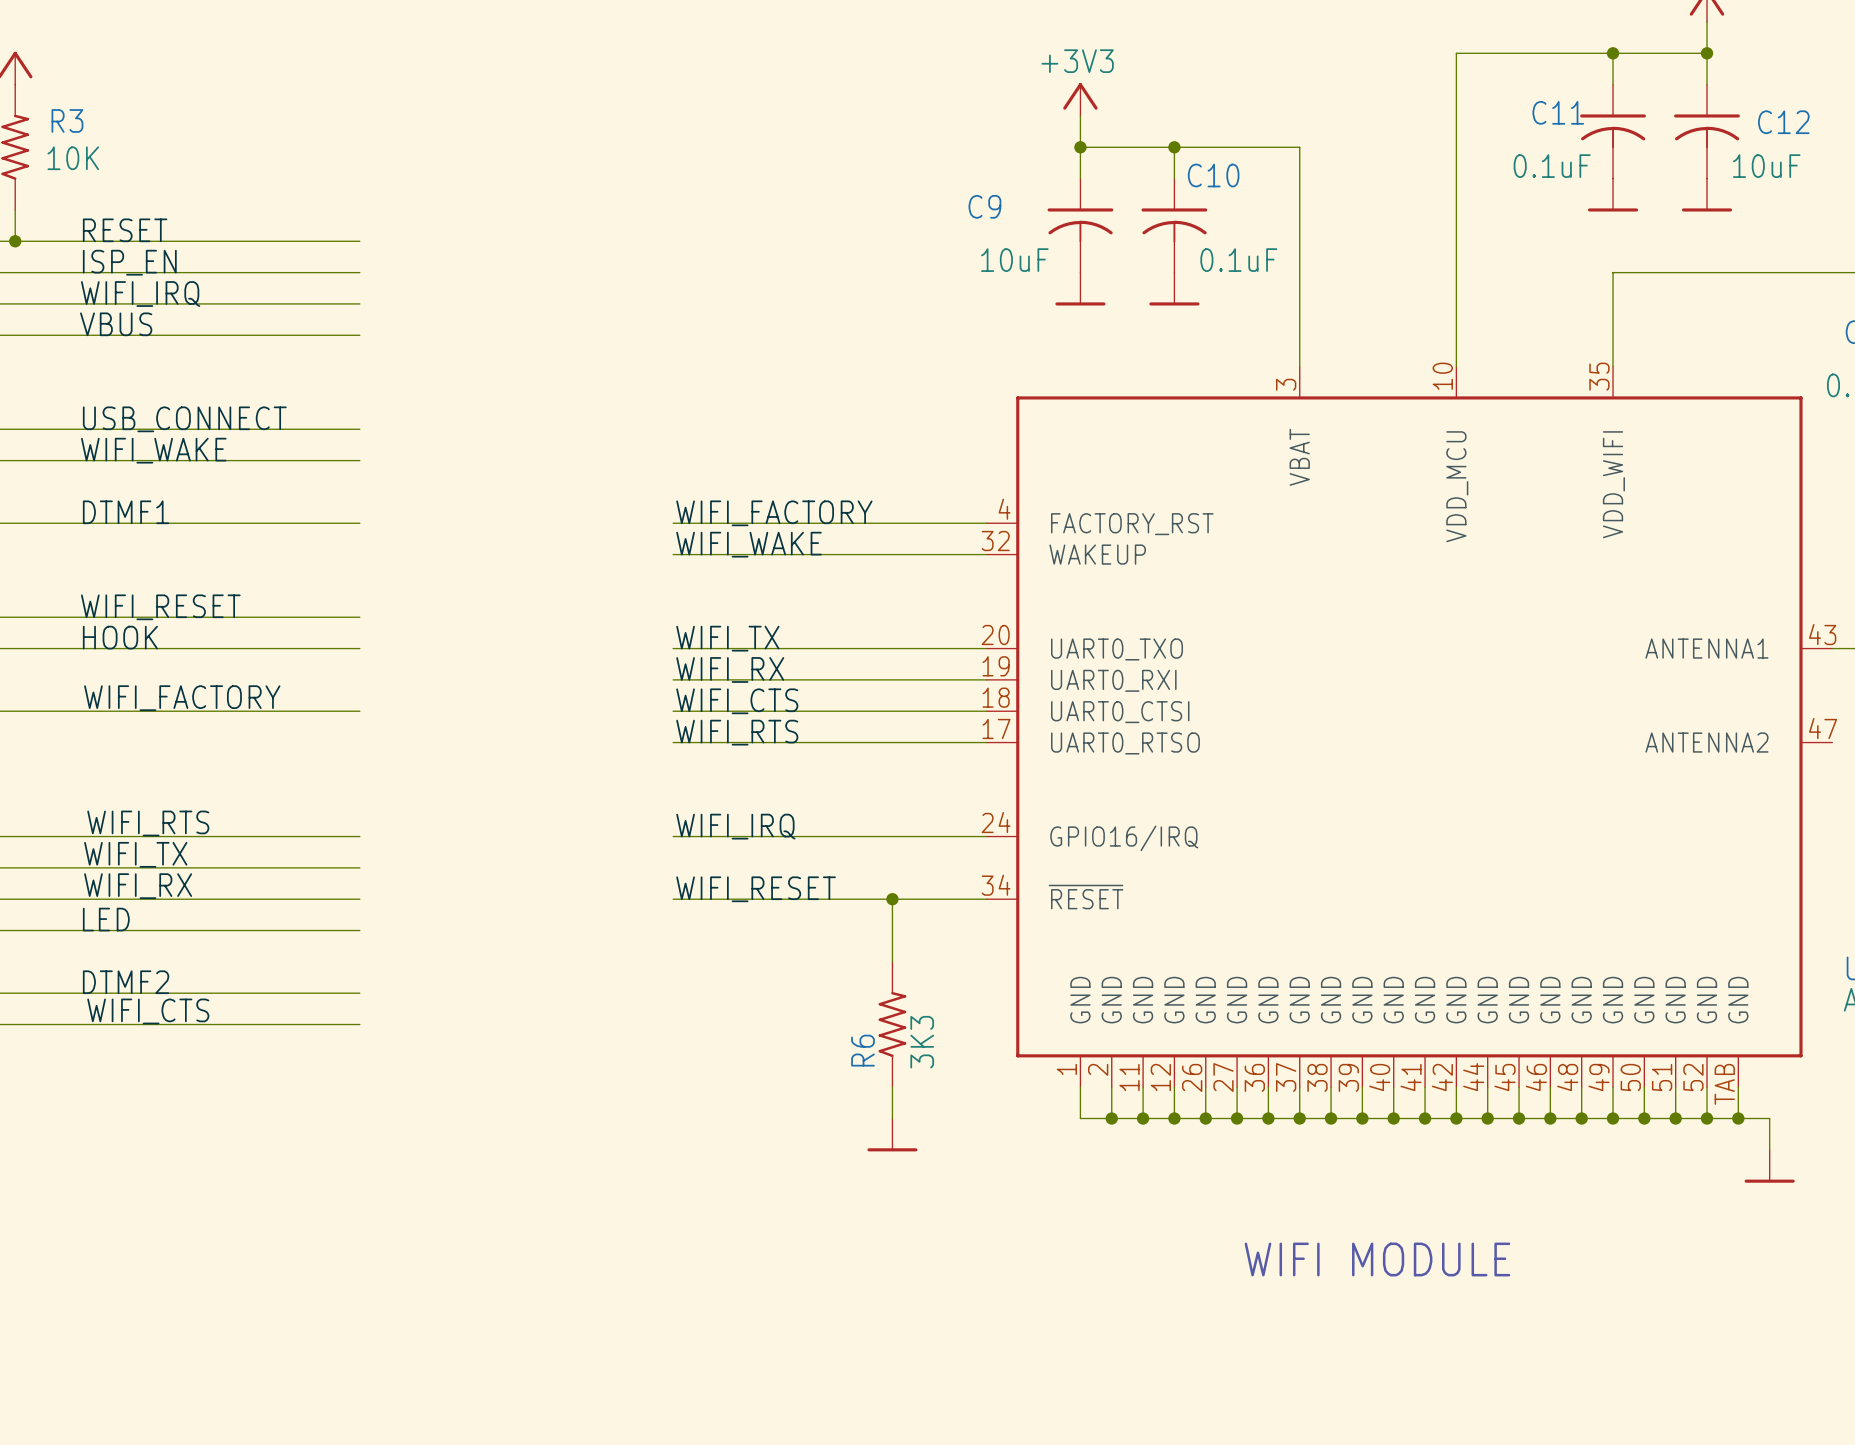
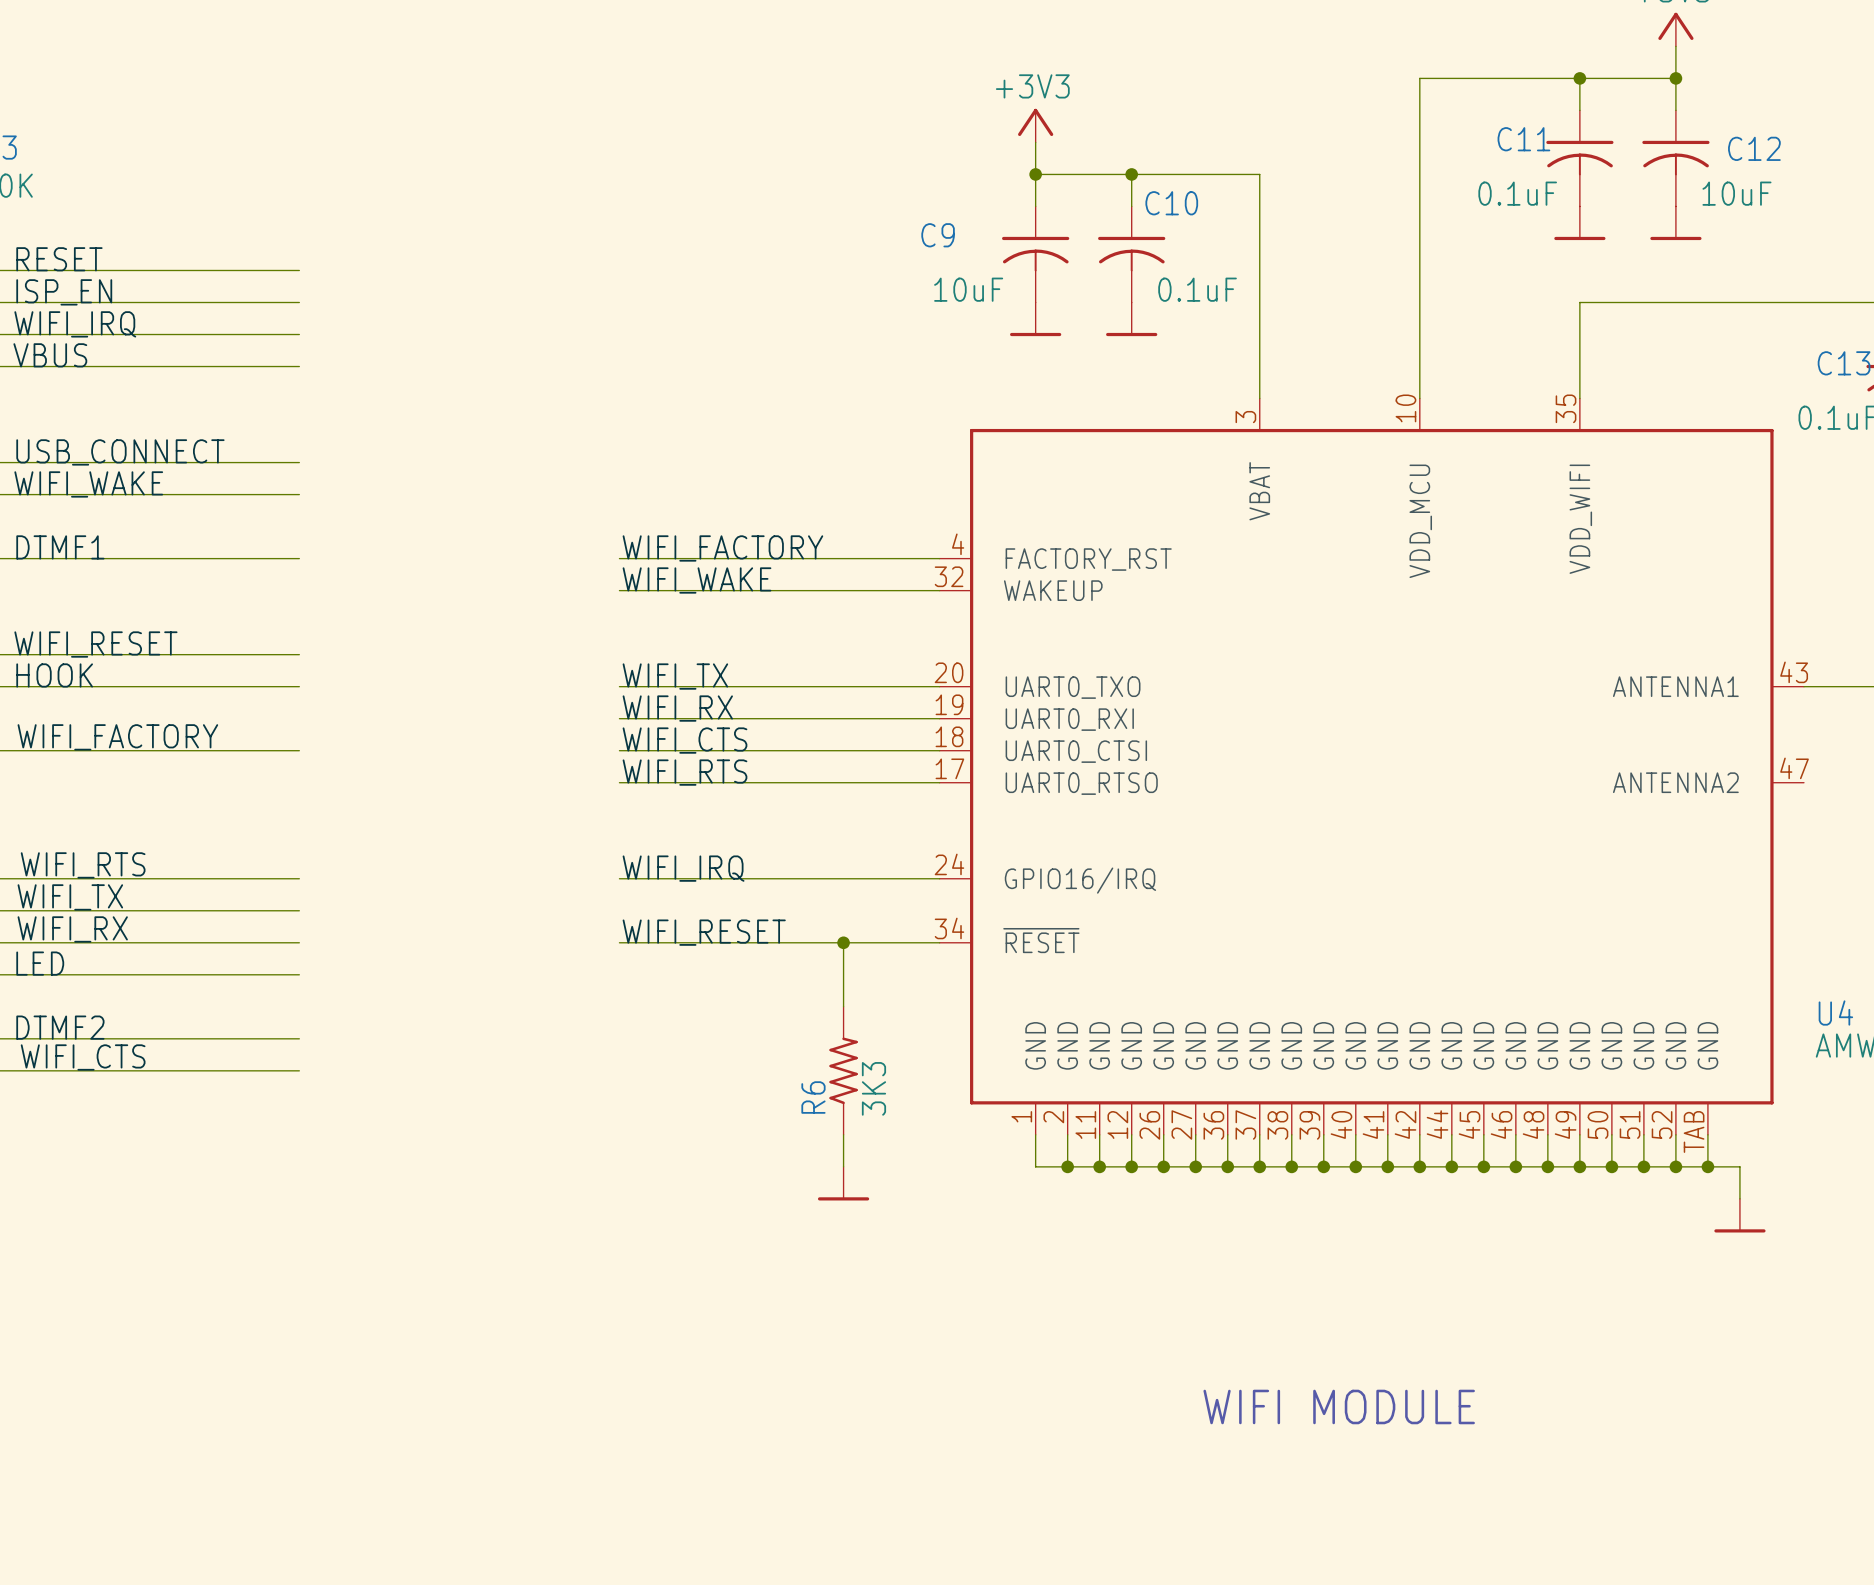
text position: WIFI MODULE (1377, 1259) -> WIFI MODULE (1339, 1406)

